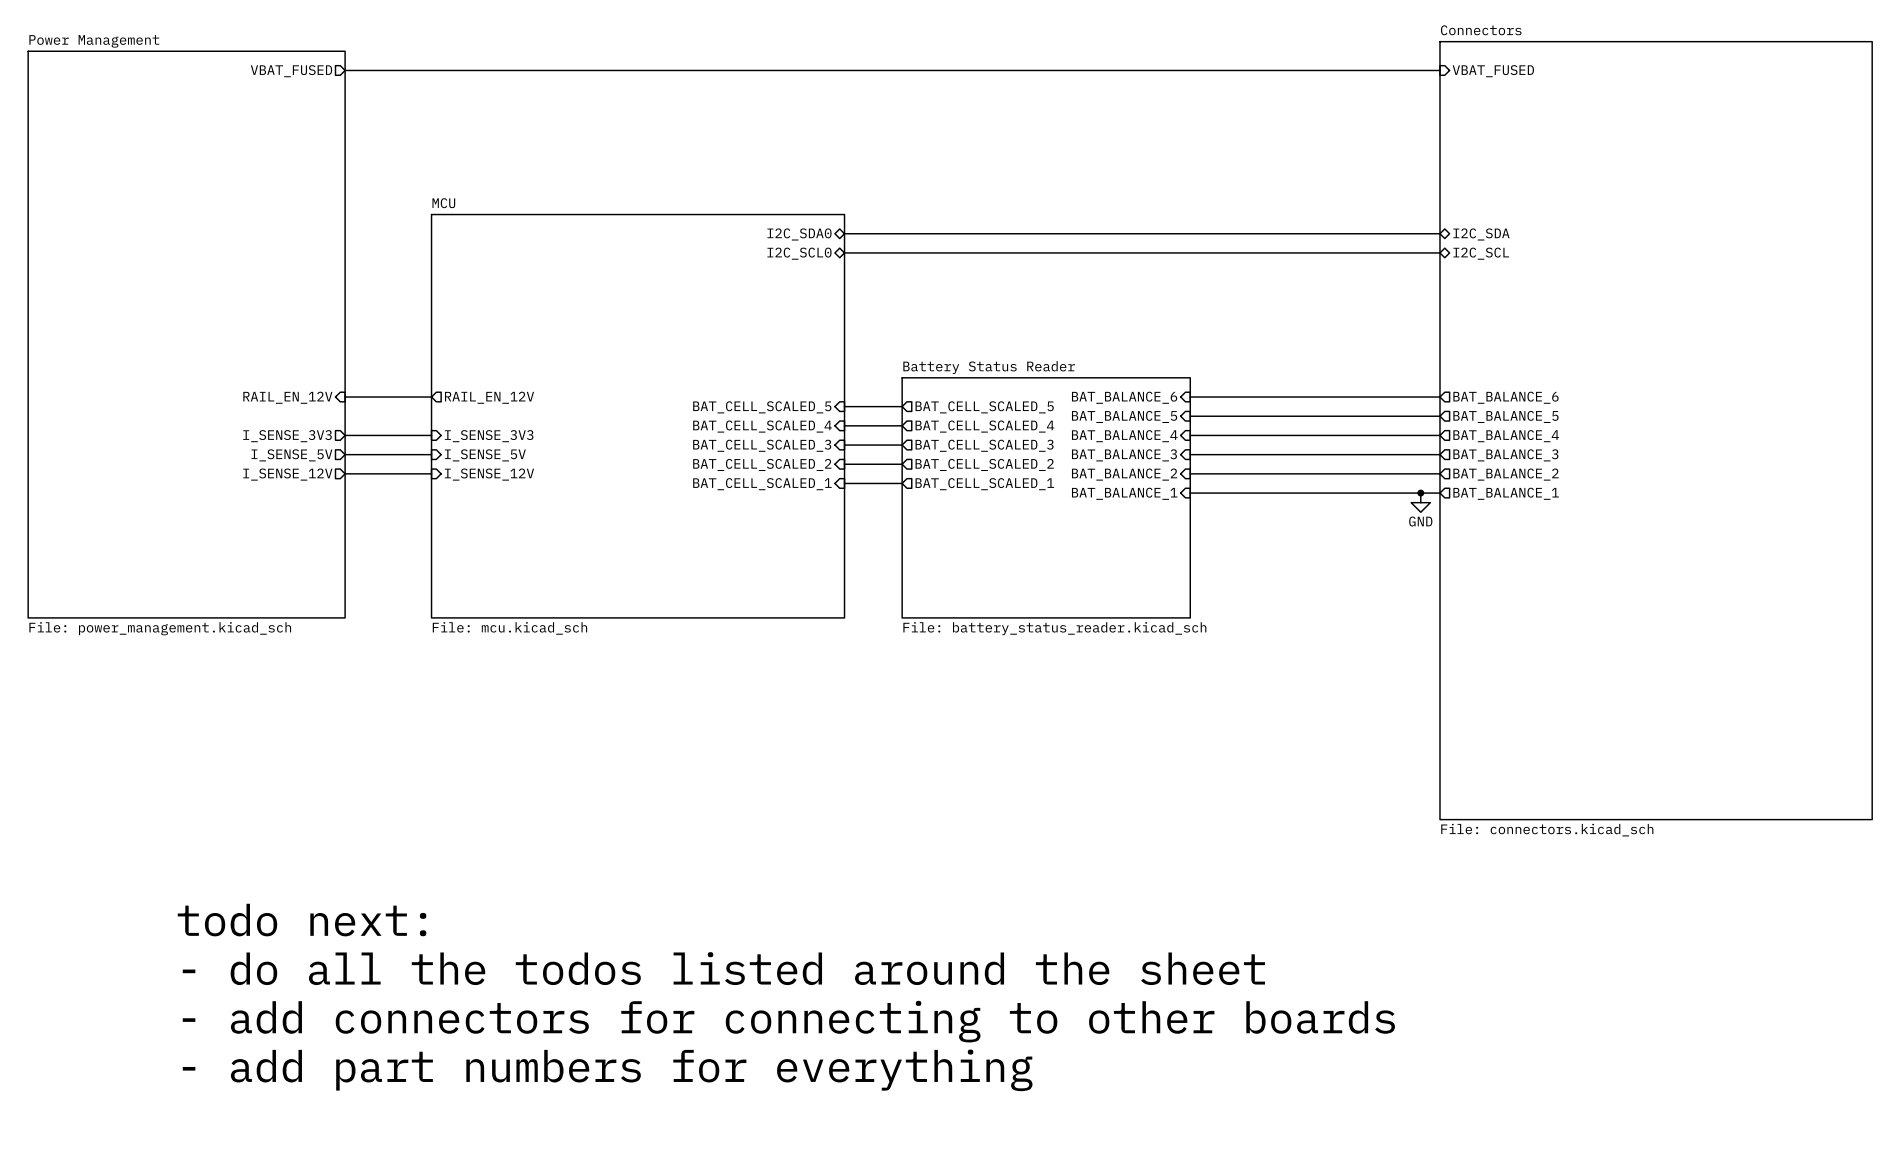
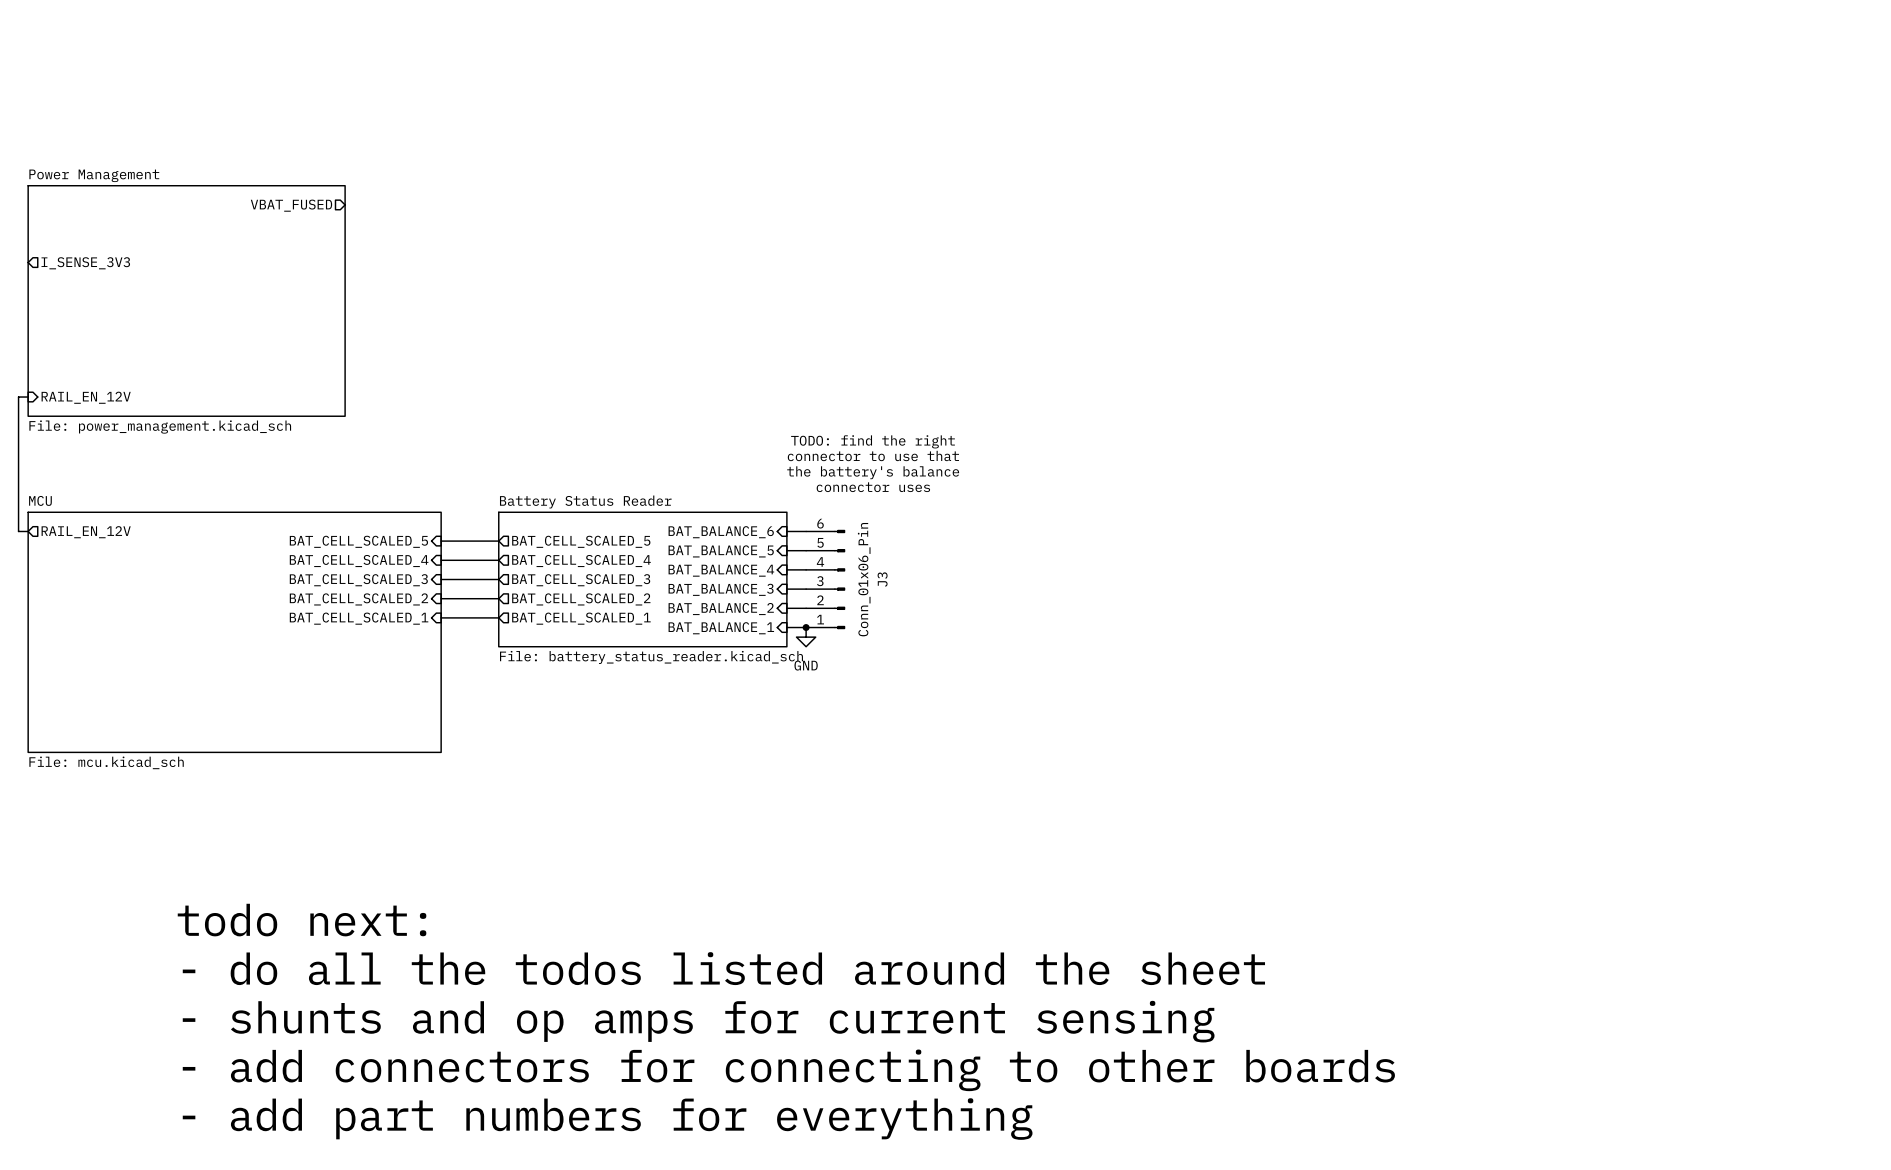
wire: (345, 70) (1439, 70) -> none
sheet pin position: VBAT_FUSED (291, 71) -> VBAT_FUSED (291, 205)
sheet pin: VBAT_FUSED (1493, 71) -> none
wire: (844, 233) (1439, 233) -> none
sheet pin: I2C_SDA0 (799, 234) -> none
sheet pin: I2C_SDA (1481, 234) -> none
wire: (844, 252) (1439, 252) -> none
sheet pin: I2C_SCL0 (799, 253) -> none
sheet pin: I2C_SCL (1481, 253) -> none
sheet pin: none -> I_SENSE_3V3 (85, 263)
sheet Power Management: none -> File: power_management.kicad_sch (186, 300)
sheet Power Management: File: power_management.kicad_sch (186, 334) -> none
wire: none -> (28, 397) (18, 397) (18, 531) (28, 531)
sheet pin: none -> RAIL_EN_12V (86, 397)
sheet pin: RAIL_EN_12V (287, 397) -> none
wire: (345, 397) (431, 397) -> none
sheet pin: RAIL_EN_12V (489, 397) -> none
sheet pin: BAT_BALANCE_6 (1124, 397) -> none
wire: (1190, 397) (1439, 397) -> none
sheet pin: BAT_BALANCE_6 (1506, 397) -> none
wire: (844, 406) (902, 406) -> none
sheet pin: BAT_CELL_SCALED_5 (762, 407) -> none
sheet pin: BAT_CELL_SCALED_5 (984, 407) -> none
sheet MCU: File: mcu.kicad_sch (638, 416) -> none
sheet pin: BAT_BALANCE_5 (1124, 416) -> none
wire: (1190, 416) (1439, 416) -> none
sheet pin: BAT_BALANCE_5 (1505, 416) -> none
wire: (844, 425) (902, 425) -> none
sheet pin: BAT_CELL_SCALED_4 (762, 426) -> none
sheet pin: BAT_CELL_SCALED_4 (984, 426) -> none
sheet Connectors: File: connectors.kicad_sch (1656, 430) -> none
wire: (345, 435) (431, 435) -> none
wire: (1190, 435) (1439, 435) -> none
sheet pin: I_SENSE_3V3 (287, 436) -> none
sheet pin: I_SENSE_3V3 (489, 436) -> none
sheet pin: BAT_BALANCE_4 (1124, 436) -> none
sheet pin: BAT_BALANCE_4 (1506, 436) -> none
text: none -> TODO: find the right (872, 441)
sheet pin: BAT_CELL_SCALED_3 (762, 445) -> none
wire: (844, 445) (902, 445) -> none
sheet pin: BAT_CELL_SCALED_3 (984, 445) -> none
wire: (345, 454) (431, 454) -> none
wire: (1190, 454) (1439, 454) -> none
sheet pin: I_SENSE_5V (291, 455) -> none
sheet pin: I_SENSE_5V (485, 455) -> none
text: none -> connector to use that (873, 455)
sheet pin: BAT_BALANCE_3 (1124, 455) -> none
sheet pin: BAT_BALANCE_3 (1505, 455) -> none
sheet pin: BAT_CELL_SCALED_2 (762, 464) -> none
wire: (844, 464) (902, 464) -> none
sheet pin: BAT_CELL_SCALED_2 (984, 464) -> none
text: none -> the battery's balance (873, 472)
wire: (345, 473) (431, 473) -> none
wire: (1190, 473) (1439, 473) -> none
sheet pin: I_SENSE_12V (287, 474) -> none
sheet pin: I_SENSE_12V (489, 474) -> none
sheet pin: BAT_BALANCE_2 (1124, 474) -> none
sheet pin: BAT_BALANCE_2 (1506, 474) -> none
wire: (844, 483) (902, 483) -> none
sheet pin: BAT_CELL_SCALED_1 (762, 484) -> none
sheet pin: BAT_CELL_SCALED_1 (984, 484) -> none
text: none -> connector uses (873, 487)
sheet pin: BAT_BALANCE_1 (1124, 493) -> none
wire: (1190, 493) (1439, 493) -> none
junction: (1420, 493) -> none
sheet pin: BAT_BALANCE_1 (1506, 493) -> none
sheet Battery Status Reader: File: battery_status_reader.kicad_sch (1046, 497) -> none
power symbol: GND (1420, 502) -> none
wire: none -> (786, 531) (806, 531)
sheet pin: none -> RAIL_EN_12V (86, 532)
sheet pin: none -> BAT_BALANCE_6 (721, 532)
sheet pin: none -> BAT_CELL_SCALED_5 (358, 541)
wire: none -> (441, 541) (498, 541)
sheet pin: none -> BAT_CELL_SCALED_5 (581, 541)
wire: none -> (786, 550) (806, 550)
sheet pin: none -> BAT_BALANCE_5 (721, 551)
wire: none -> (441, 560) (498, 560)
sheet pin: none -> BAT_CELL_SCALED_4 (359, 561)
sheet pin: none -> BAT_CELL_SCALED_4 (581, 561)
wire: none -> (786, 569) (806, 569)
sheet pin: none -> BAT_BALANCE_4 (721, 570)
wire: none -> (441, 579) (498, 579)
sheet Battery Status Reader: none -> File: battery_status_reader.kicad_sch (642, 579)
J3: none -> Conn_01x06_Pin (825, 579)
sheet pin: none -> BAT_CELL_SCALED_3 (358, 580)
sheet pin: none -> BAT_CELL_SCALED_3 (581, 580)
sheet pin: none -> BAT_BALANCE_3 (721, 589)
wire: none -> (786, 589) (806, 589)
wire: none -> (441, 598) (498, 598)
sheet pin: none -> BAT_CELL_SCALED_2 (358, 599)
sheet pin: none -> BAT_CELL_SCALED_2 (581, 599)
wire: none -> (786, 608) (806, 608)
sheet pin: none -> BAT_BALANCE_2 (721, 609)
sheet pin: none -> BAT_CELL_SCALED_1 (359, 618)
sheet pin: none -> BAT_CELL_SCALED_1 (581, 618)
wire: none -> (786, 627) (806, 627)
junction: none -> (806, 627)
sheet pin: none -> BAT_BALANCE_1 (721, 628)
sheet MCU: none -> File: mcu.kicad_sch (234, 632)
power symbol: none -> GND (806, 637)
text: - add connectors for connecting to other boards (788, 1021) -> - shunts and op amps for current sensing (698, 1021)
text: - add part numbers for everything (607, 1070) -> - add connectors for connecting to other boards (788, 1070)
text: none -> - add part numbers for everything (607, 1119)

